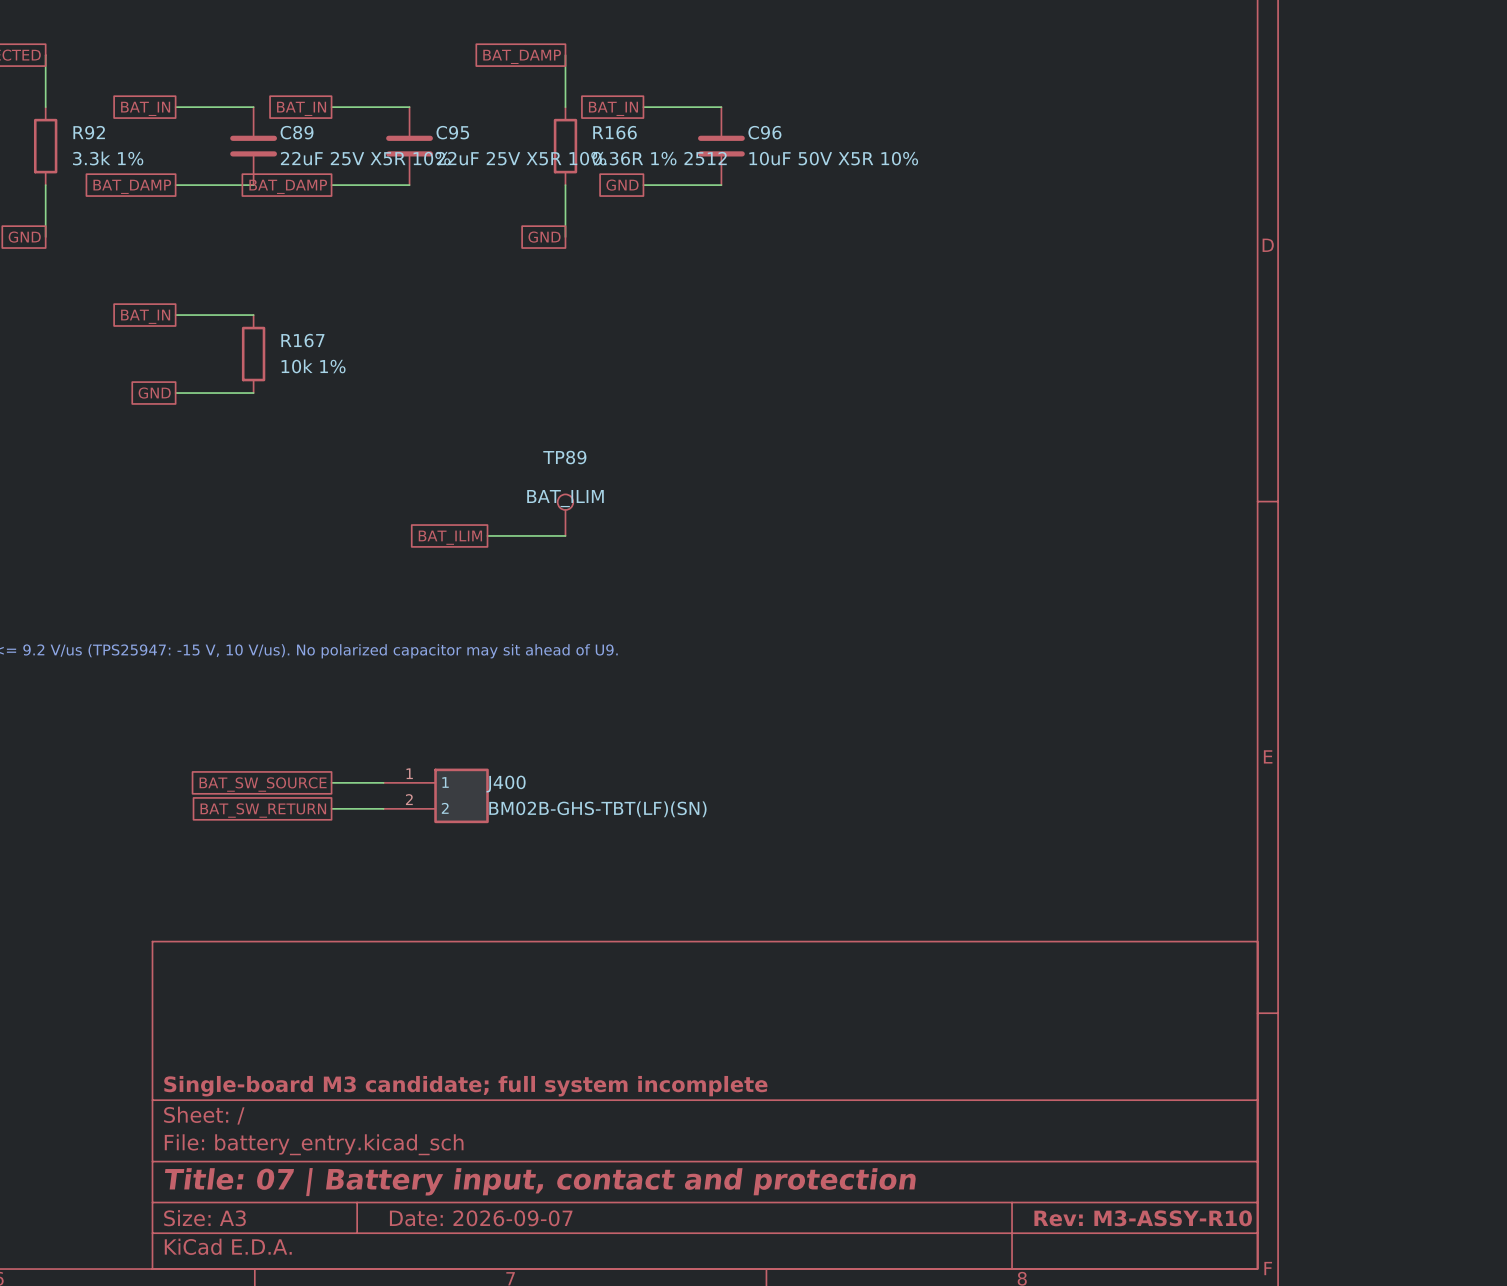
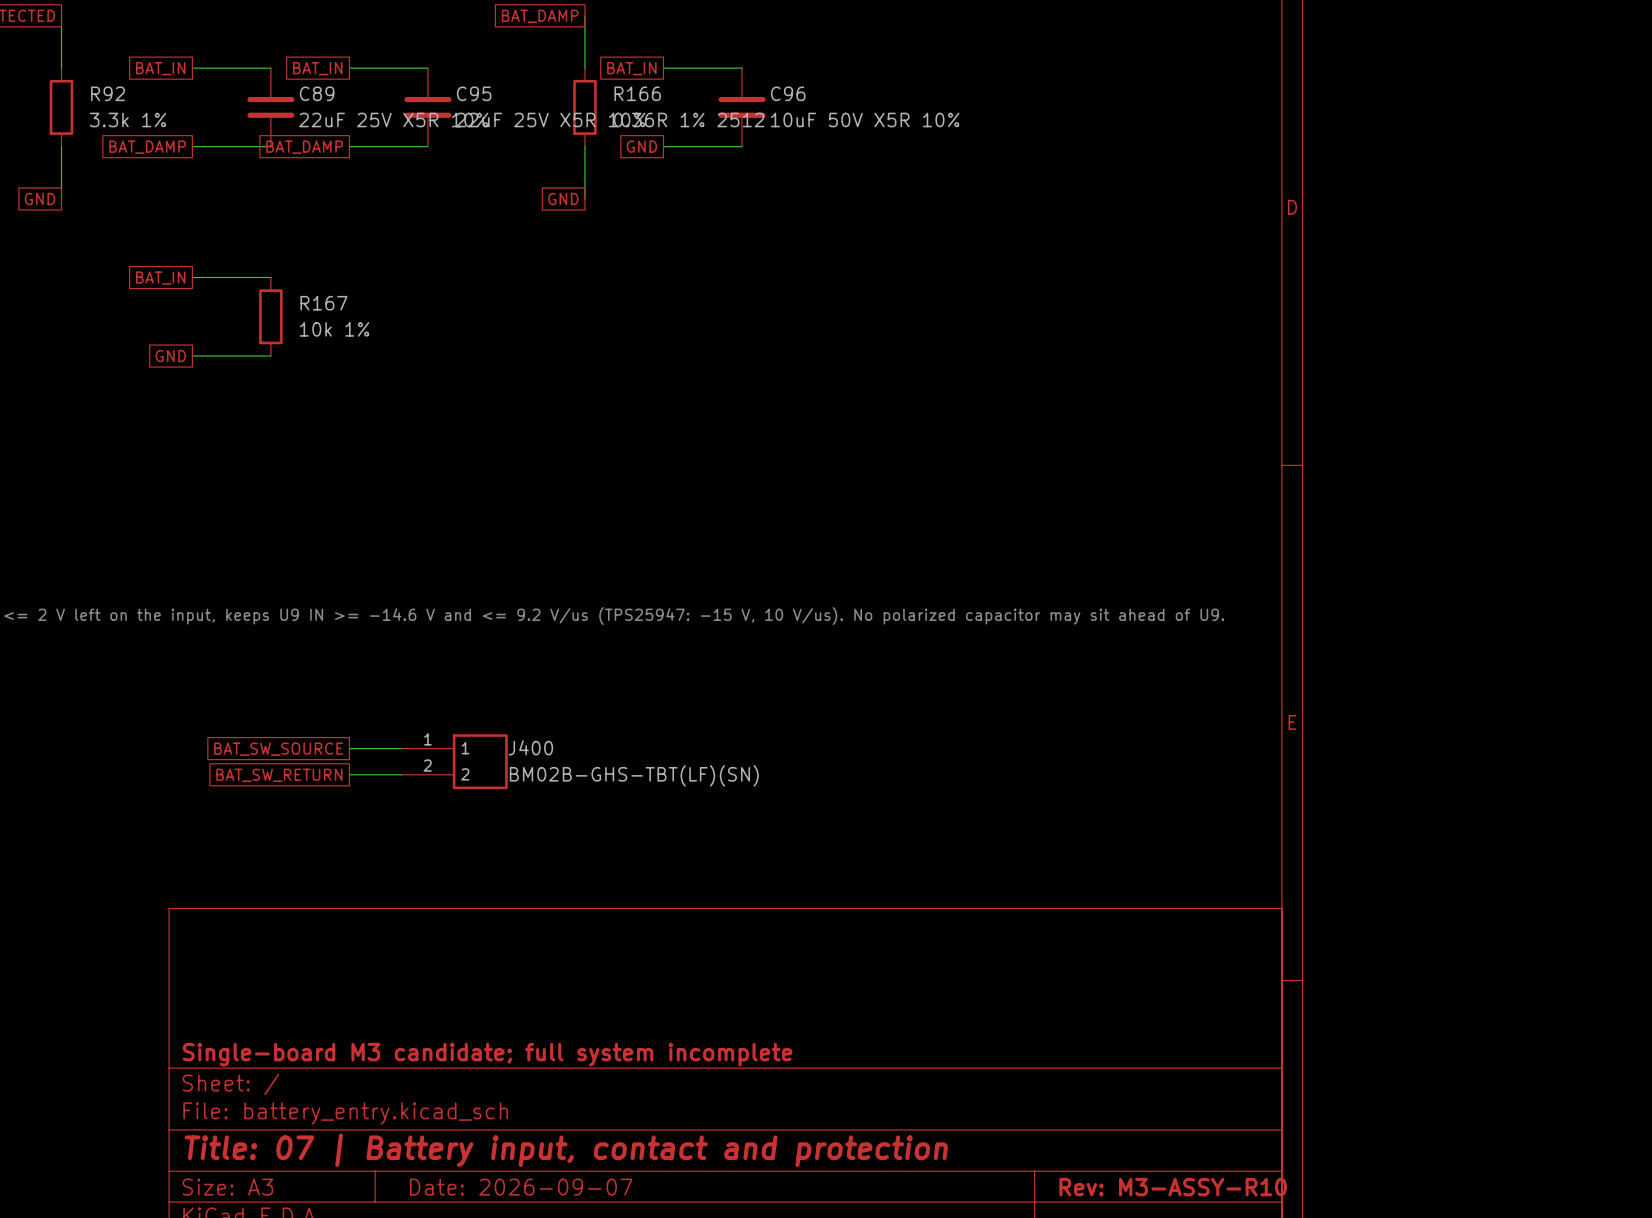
TP89: BAT_ILIM (565, 515) -> none
wire: (487, 535) (565, 535) -> none
global label: BAT_ILIM (450, 537) -> none

